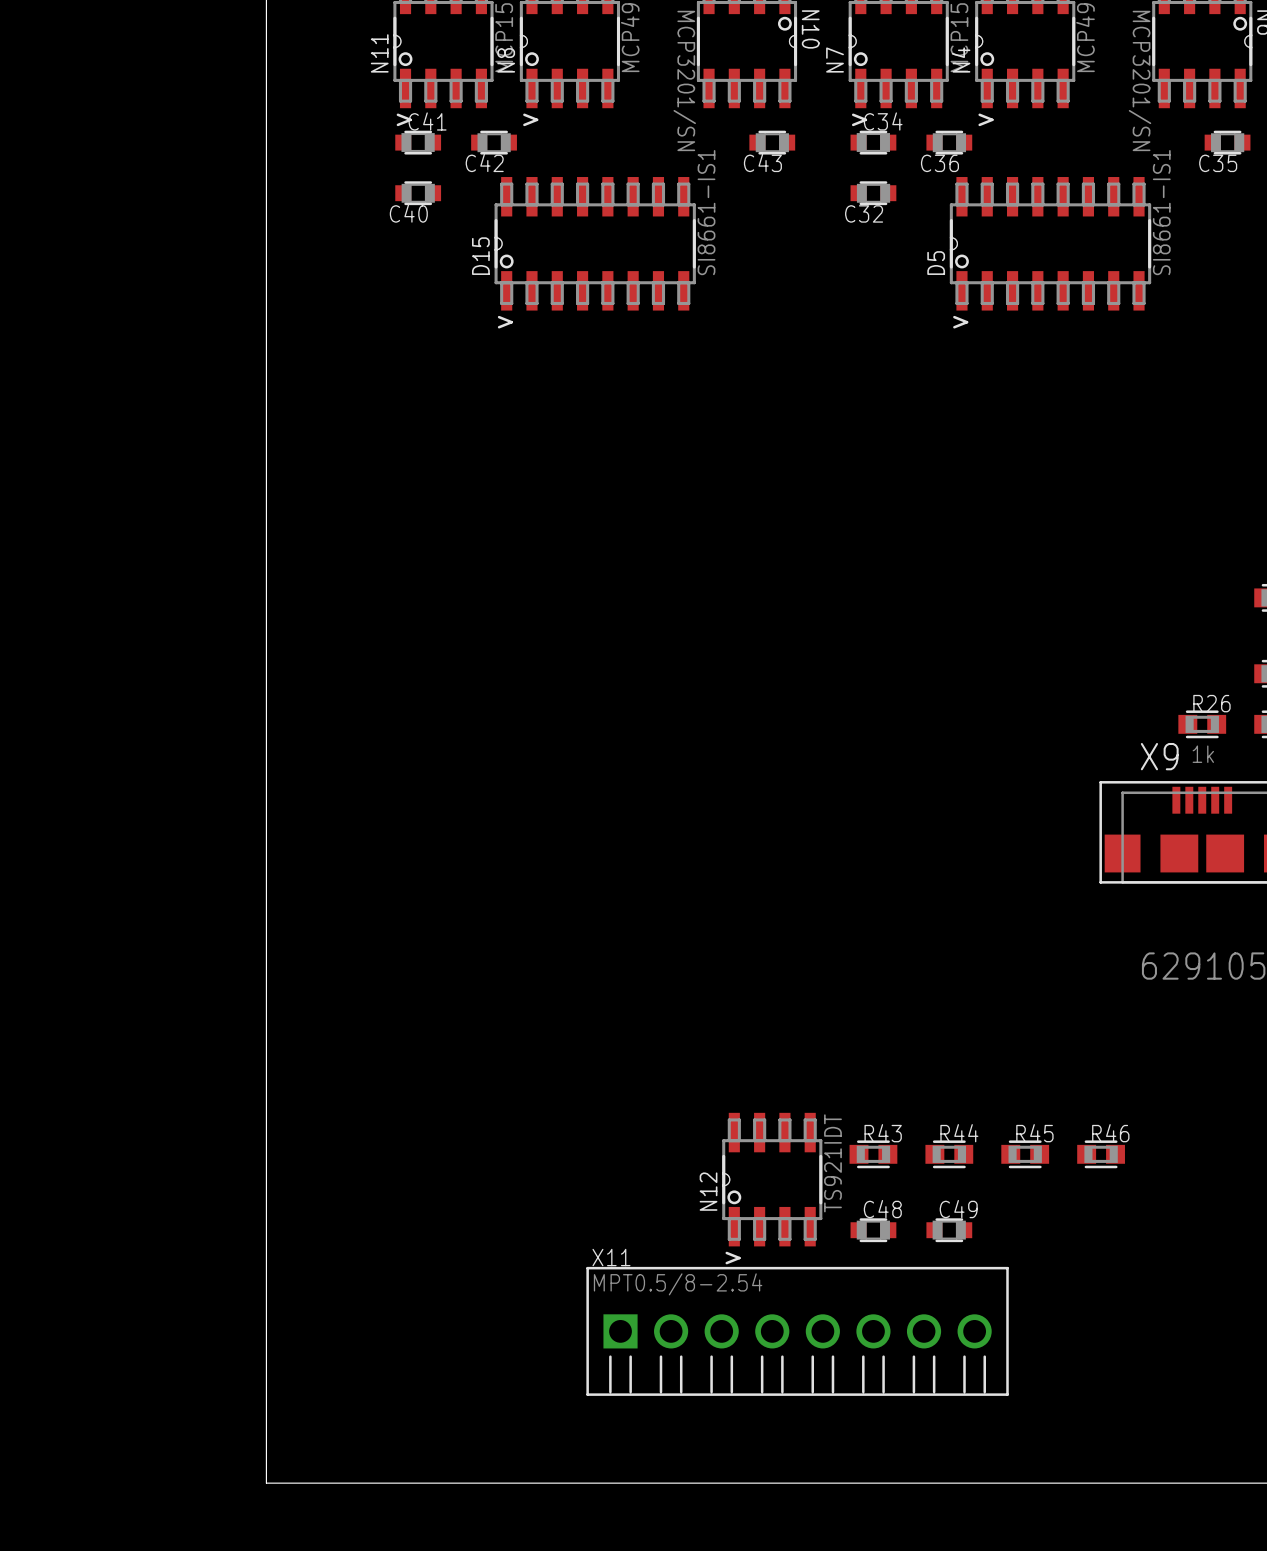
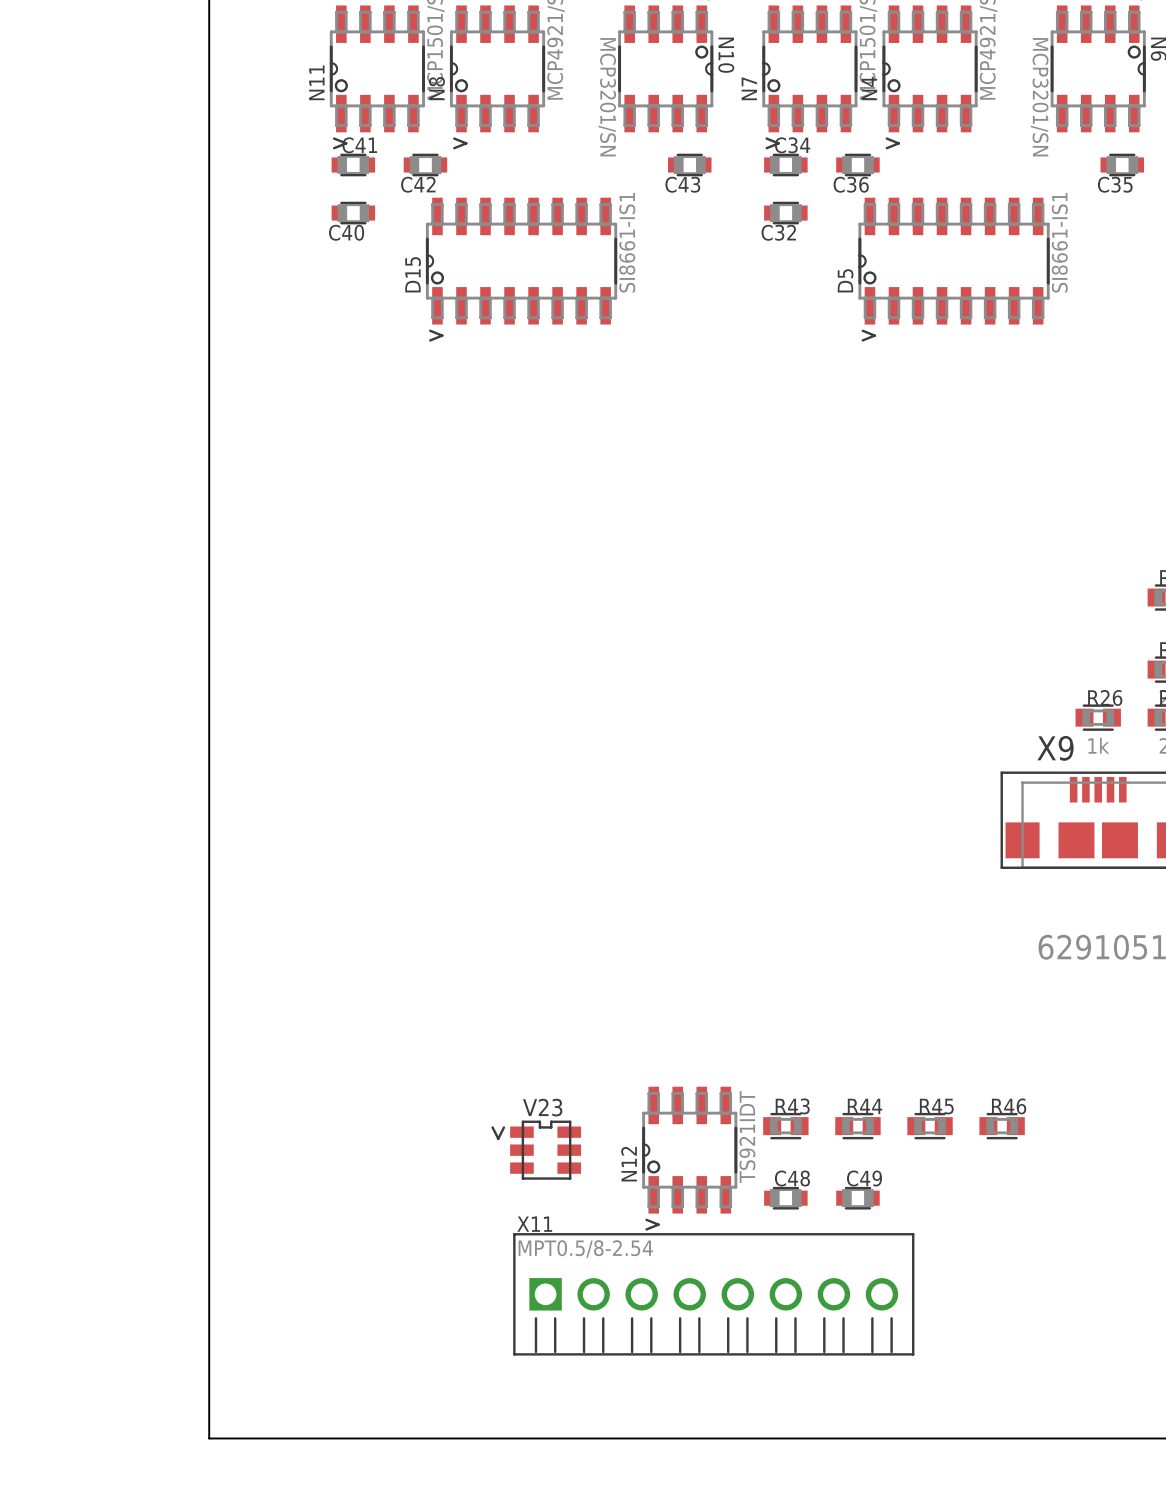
V23: none -> (536, 1150)

